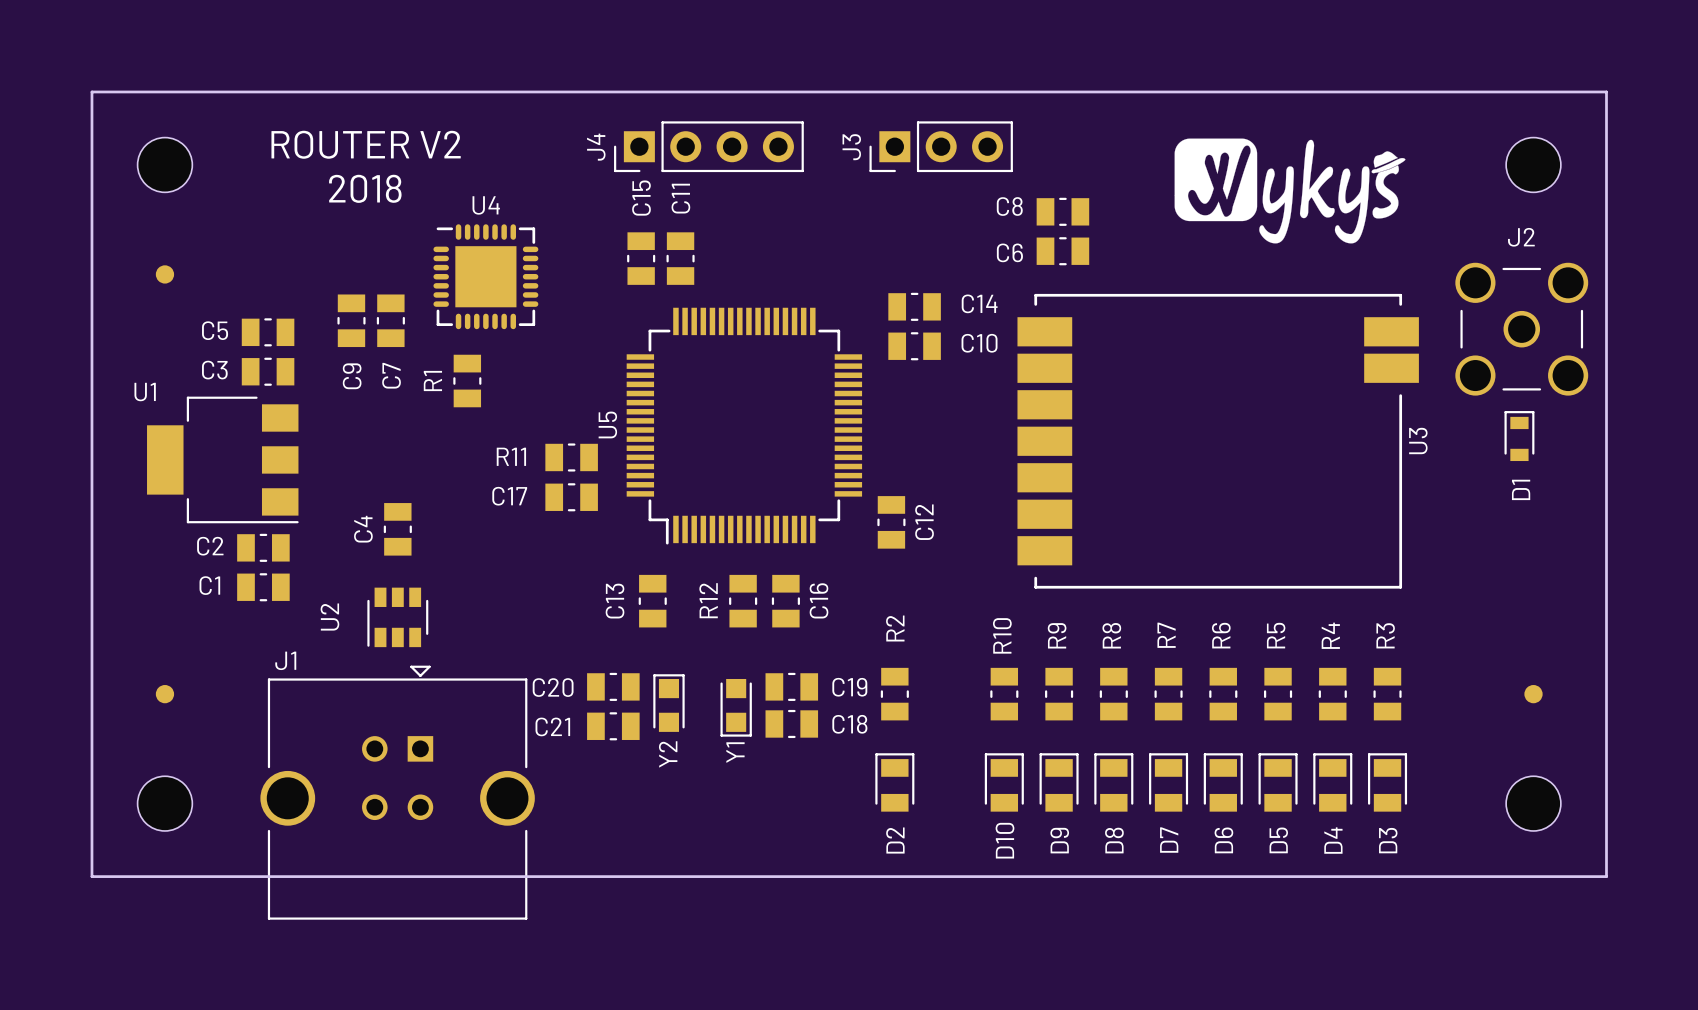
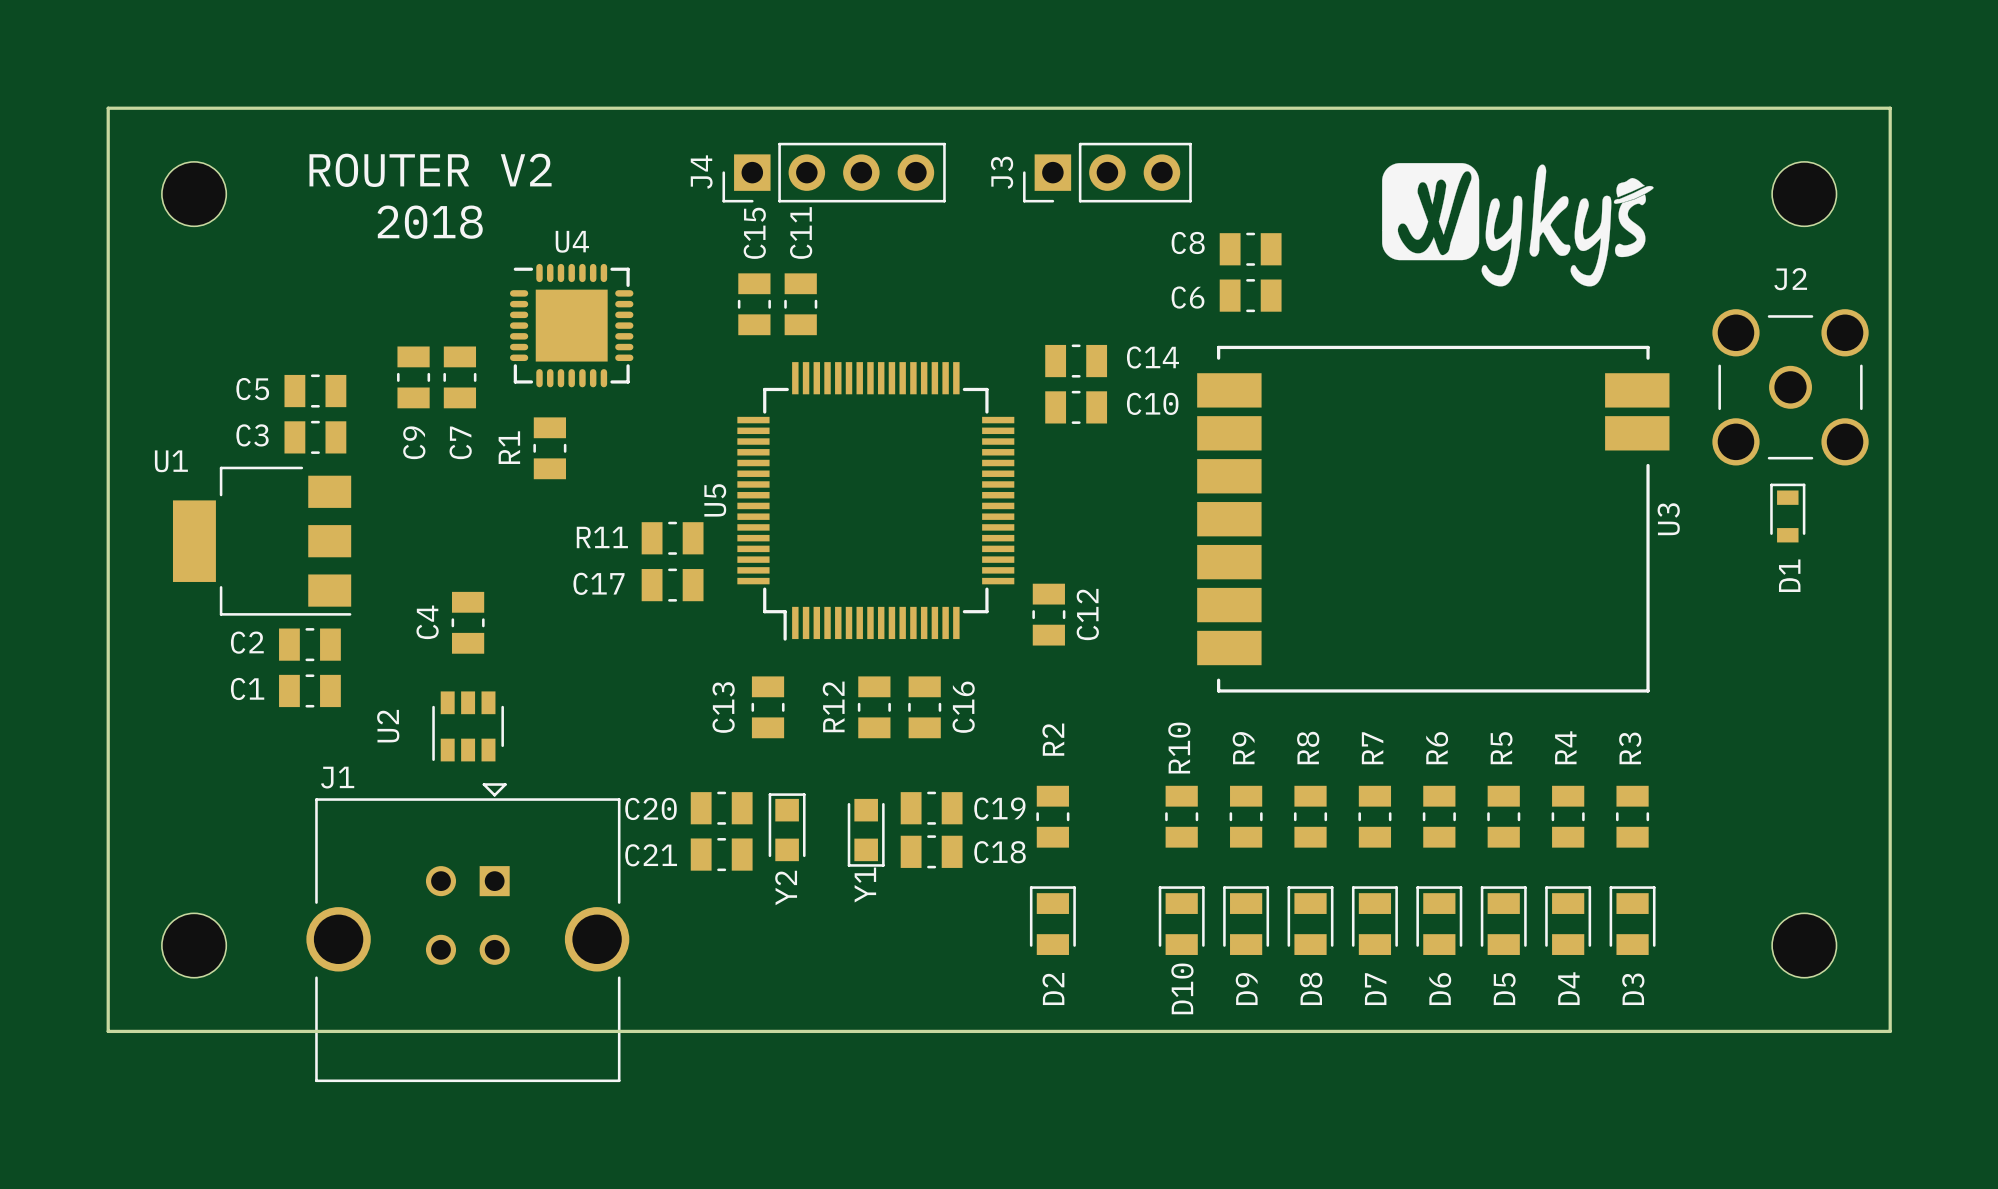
part: (164, 274) -> none
part: (164, 694) -> none
part: (1533, 694) -> none

